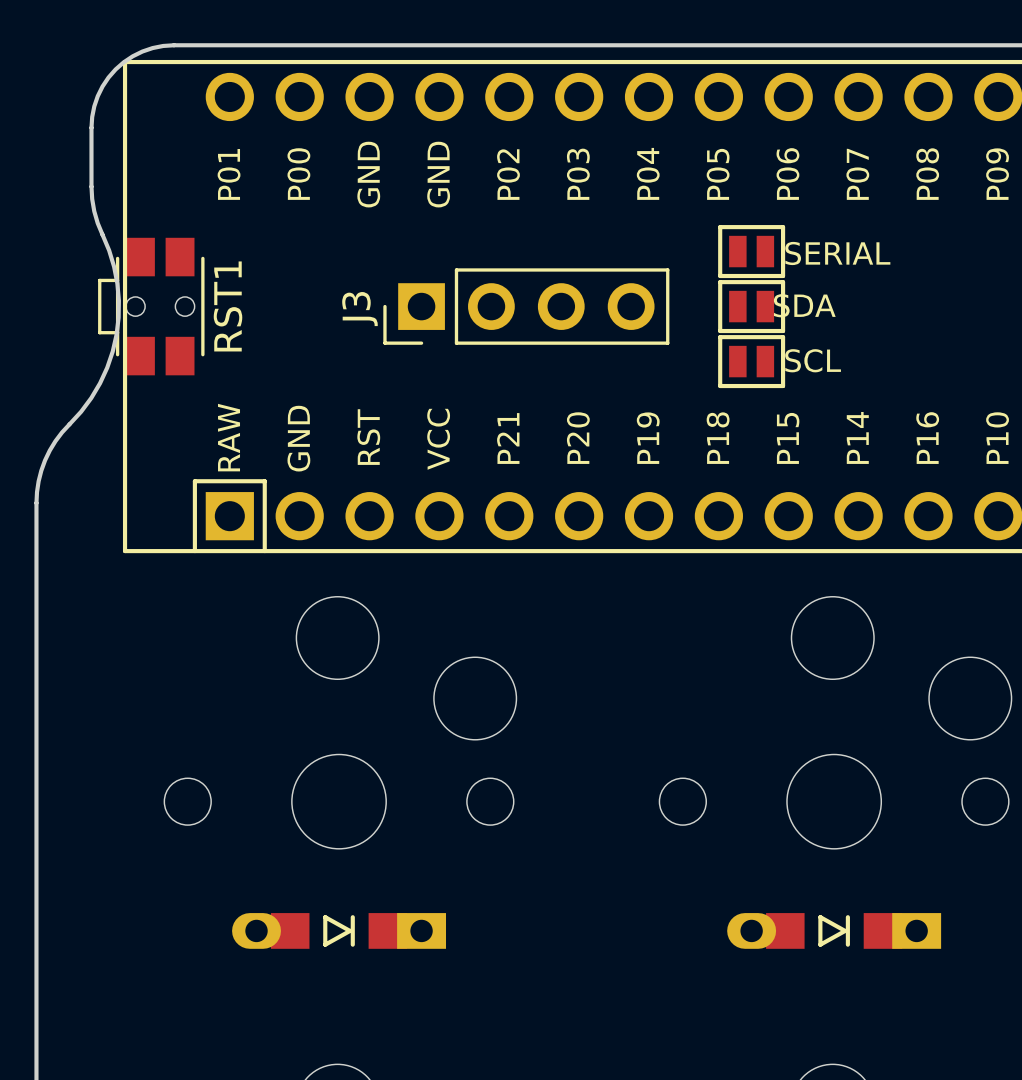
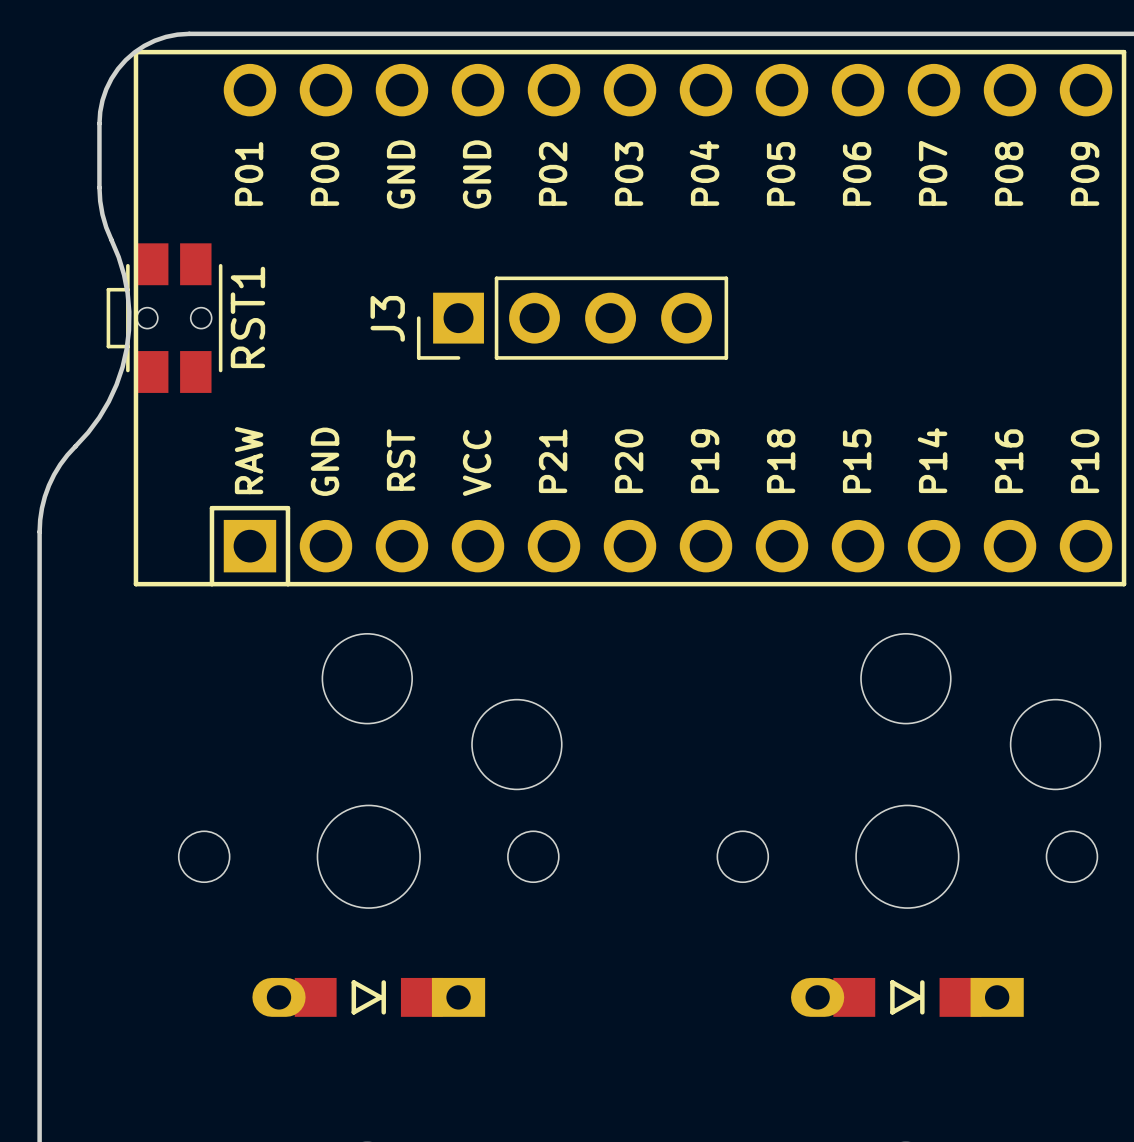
part: SERIAL (751, 251) -> none
part: SDA (751, 306) -> none
part: SCL (751, 361) -> none

